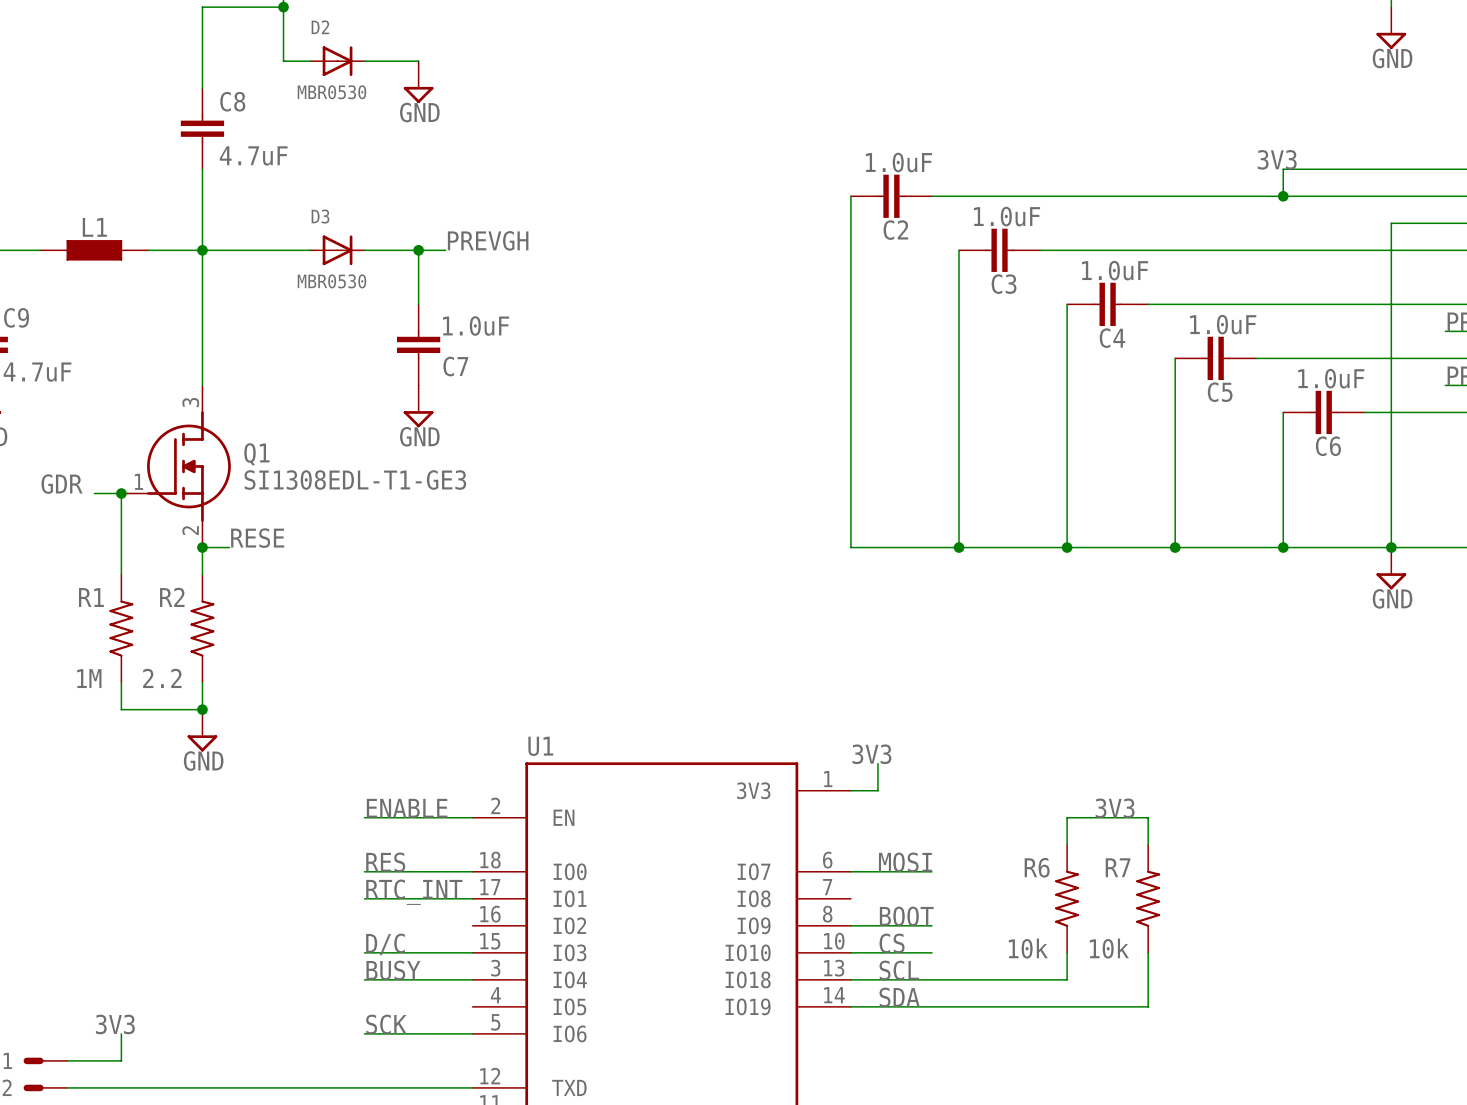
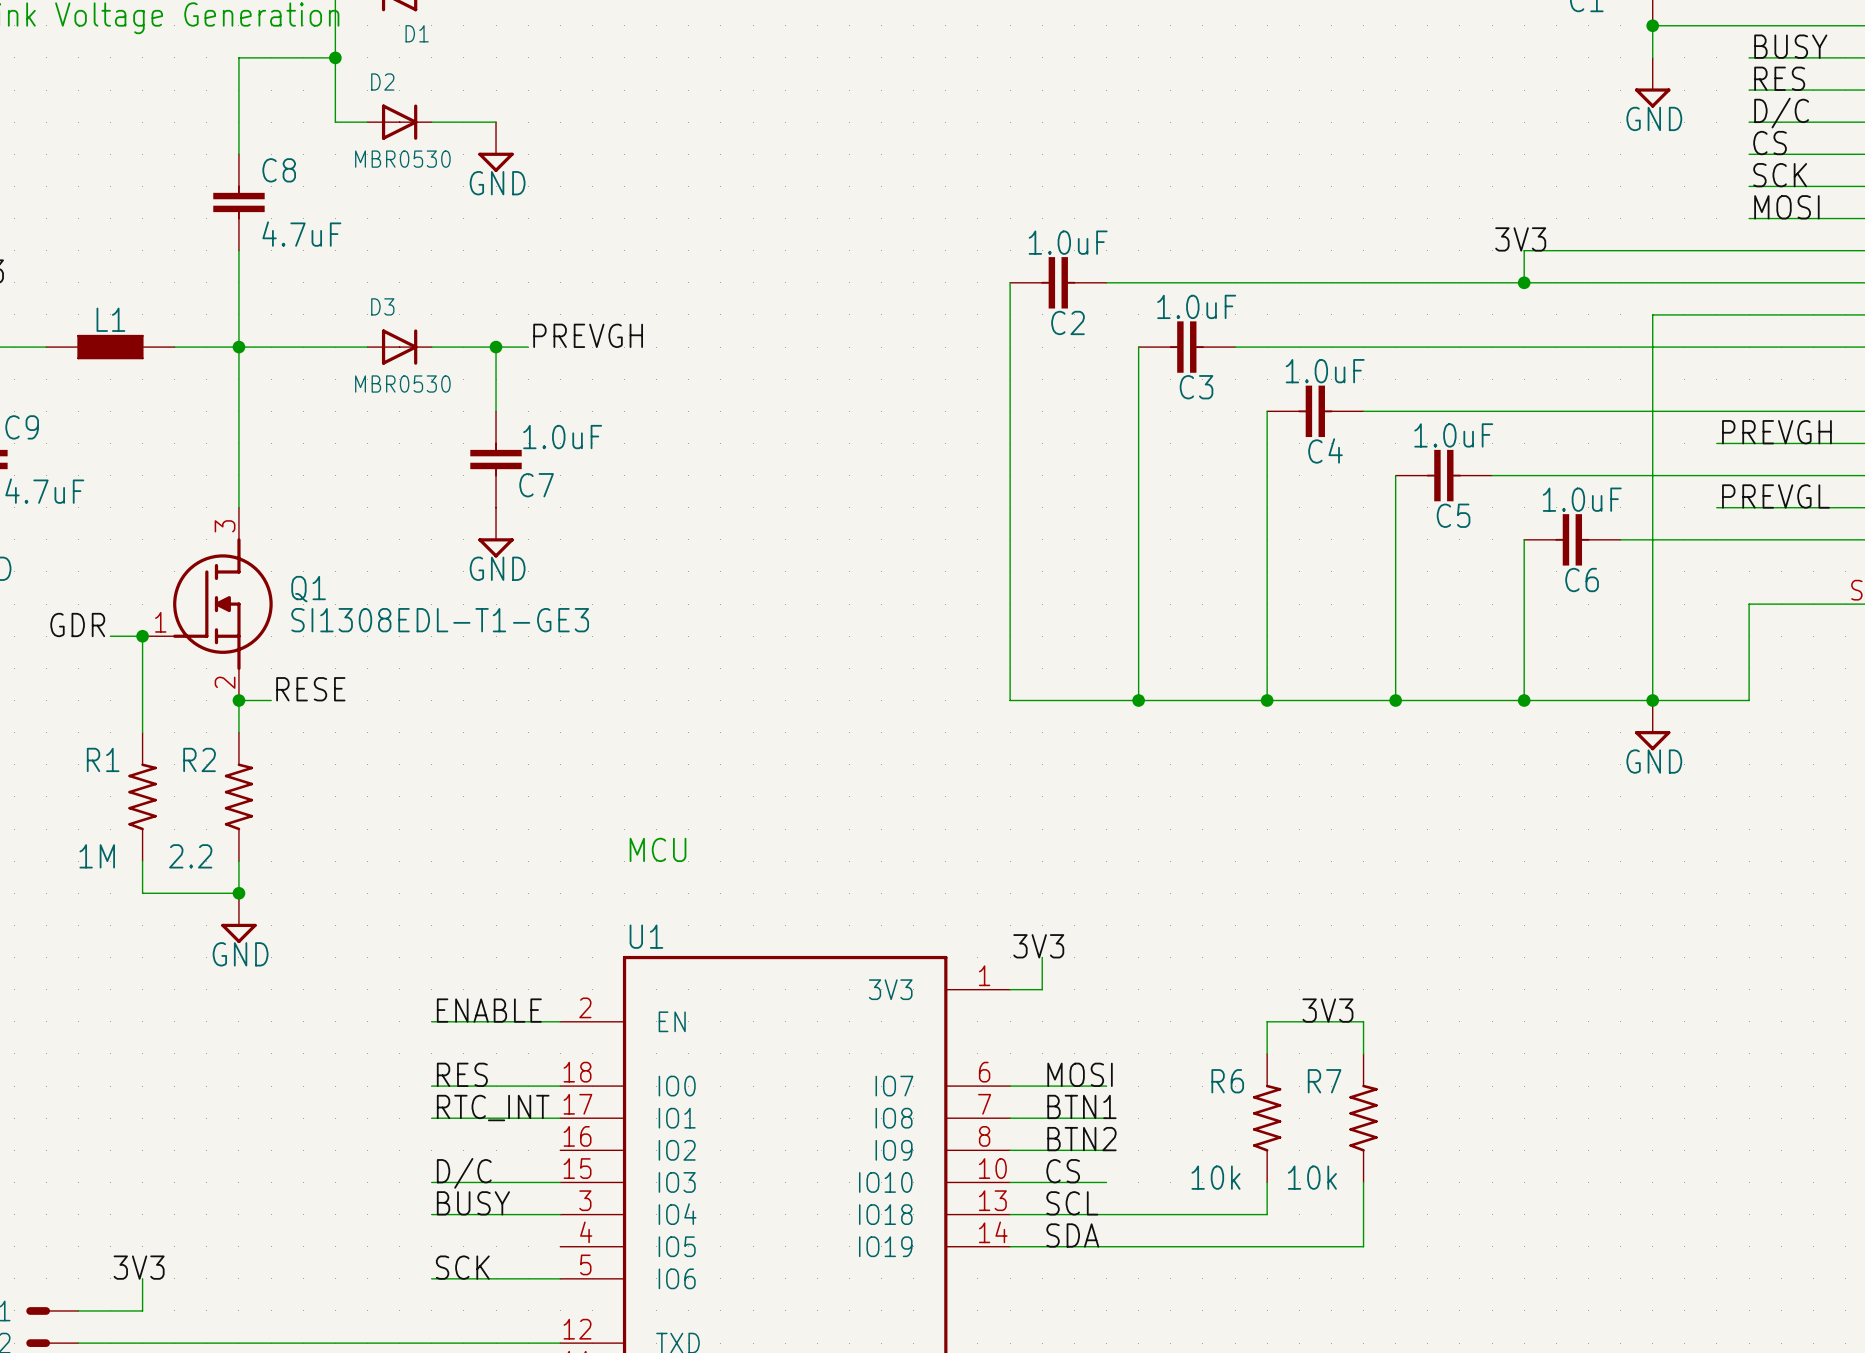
text: none -> MCU (658, 849)
label: none -> BTN1 (1081, 1106)
wire: none -> (1010, 1118) (1106, 1118)
label: BOOT (906, 916) -> BTN2 (1081, 1139)

